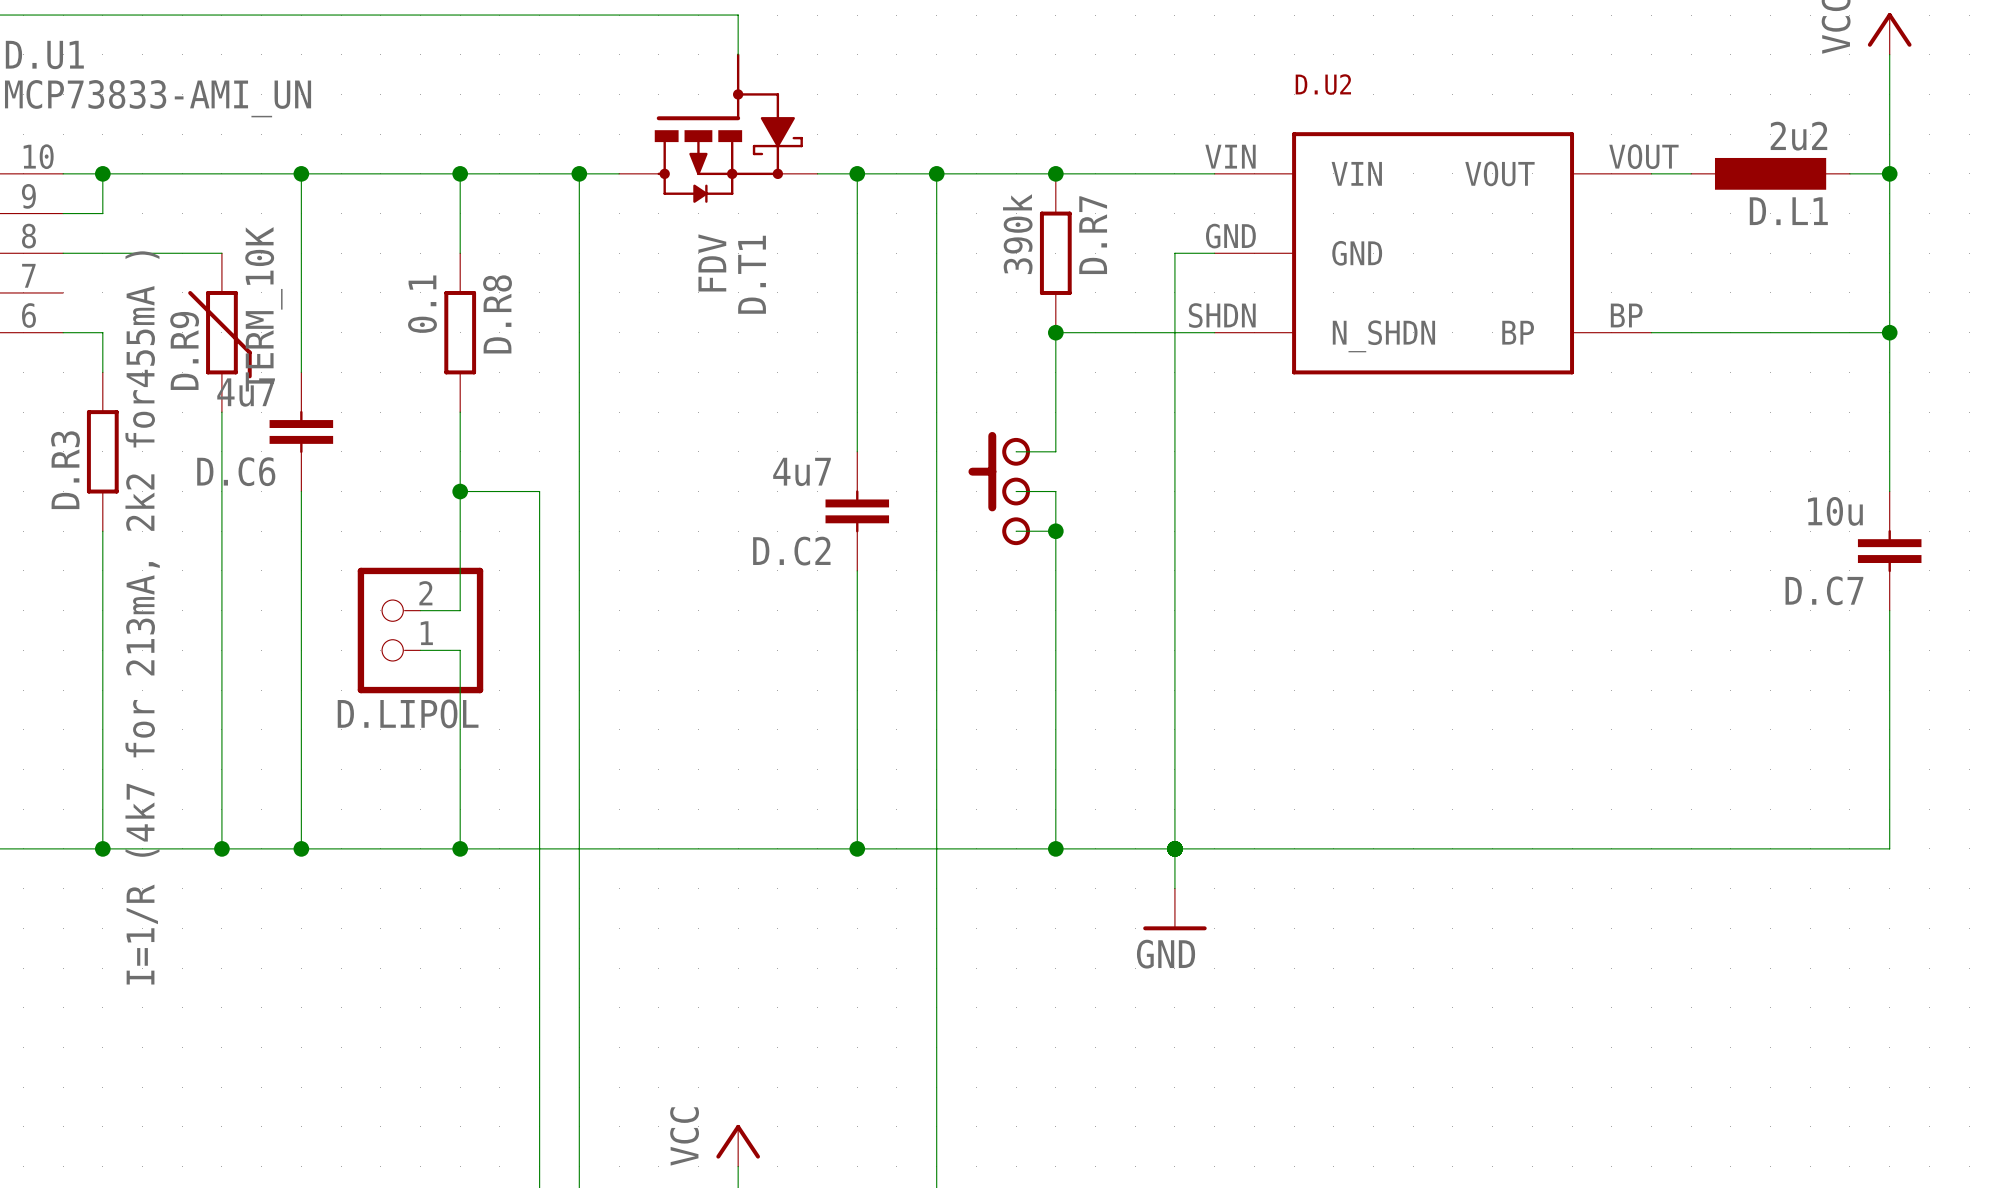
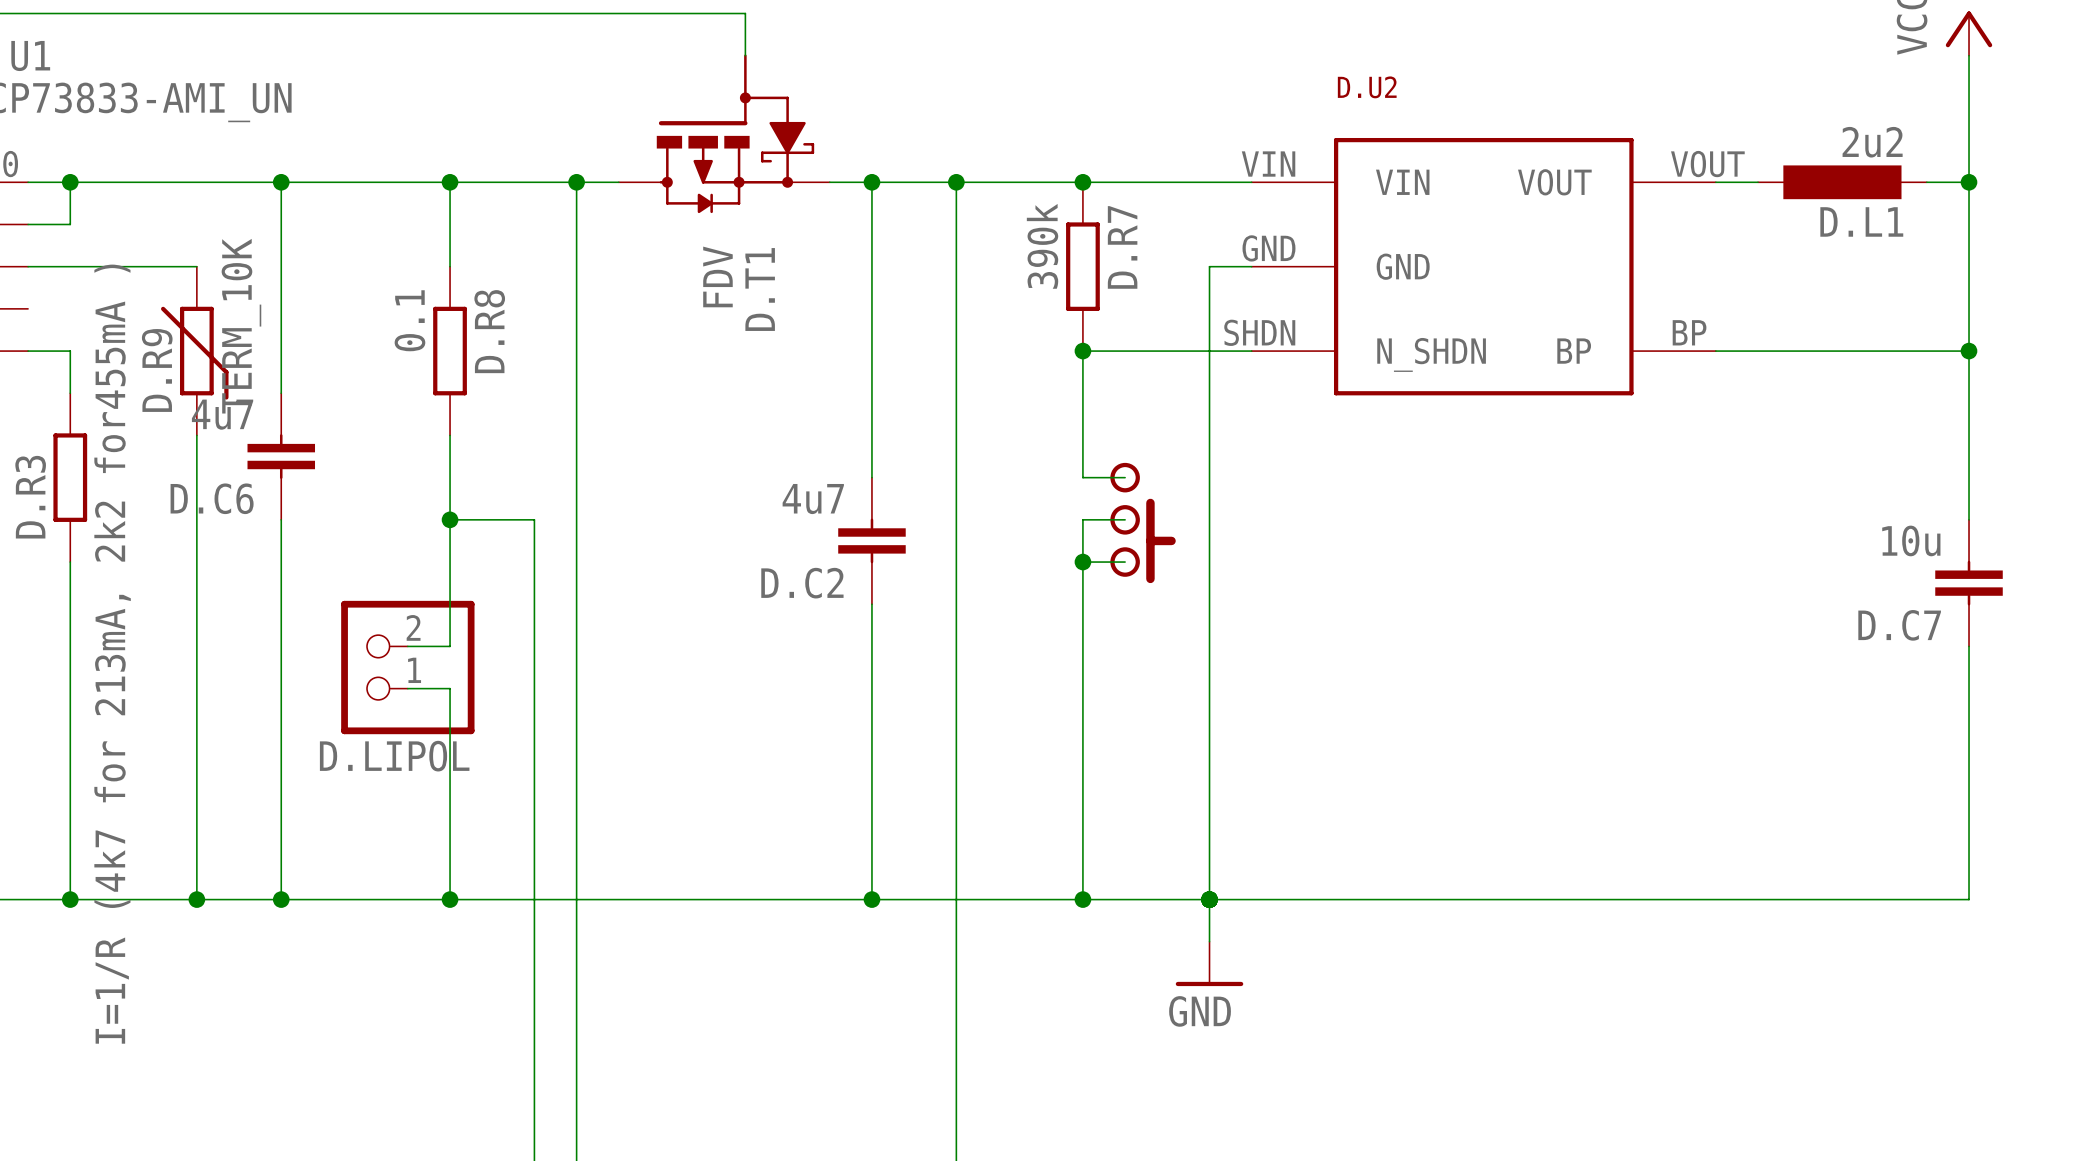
wire: (1016, 451) (1055, 451) -> (1125, 477) (1082, 477)
part rotation: 0° (999, 488) -> 180° (1143, 523)
part position: (999, 488) -> (1143, 523)
wire: (1016, 491) (1055, 491) -> (1125, 519) (1082, 519)
wire: (1016, 531) (1055, 531) -> (1125, 562) (1082, 562)

